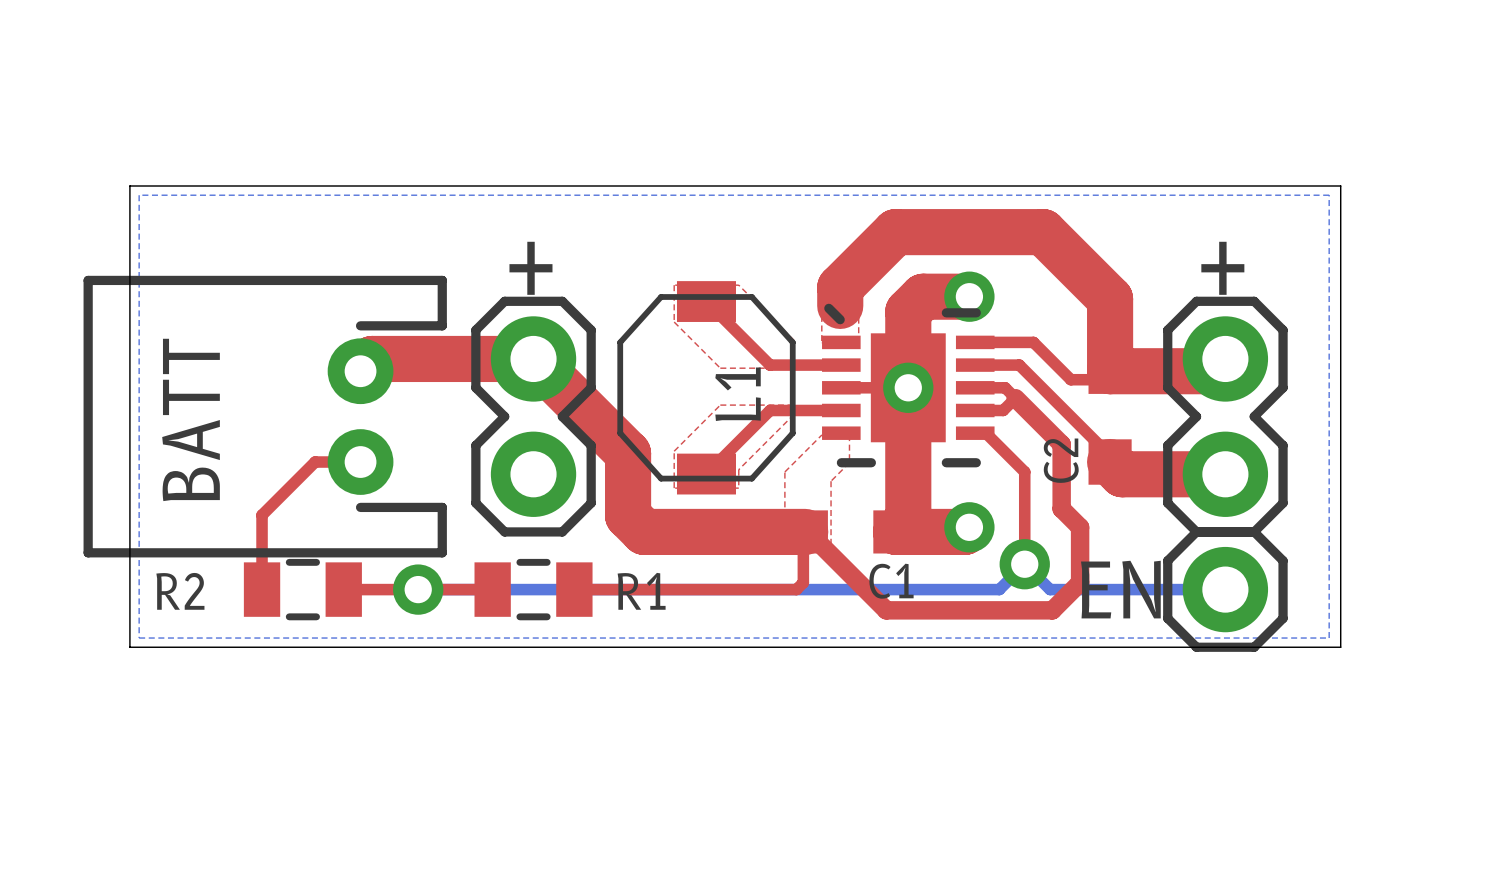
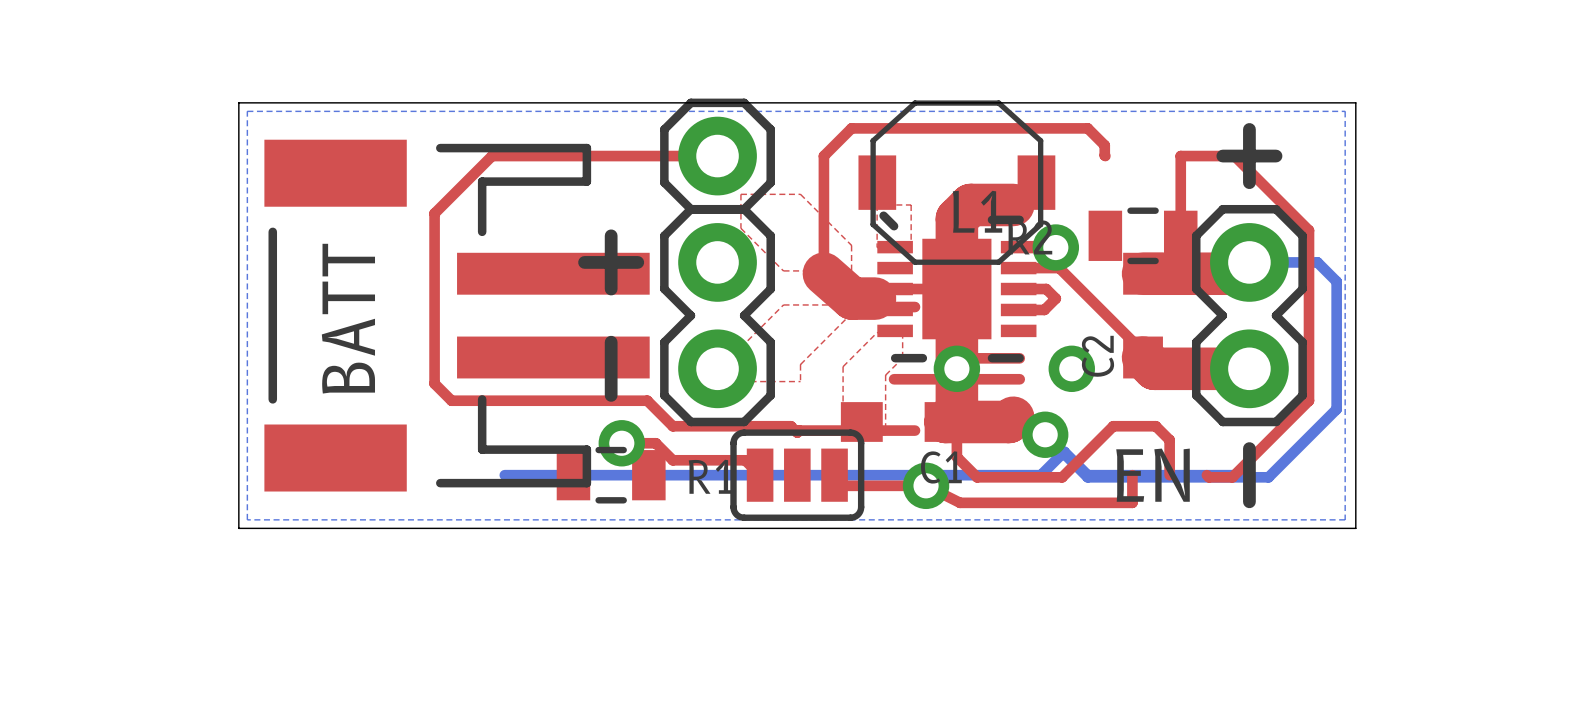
line: none -> (1249, 129) (1249, 182)
top track: none -> (717, 156) (492, 156) (434, 213) (434, 383) (451, 400) (647, 400) (672, 426) (790, 426) (797, 432) (799, 430) (915, 430)
top track: none -> (1105, 156) (1104, 145) (1087, 128) (851, 128) (823, 156) (823, 273) (852, 298) (874, 298) (883, 307) (915, 307)
line: none -> (1222, 156) (1276, 156)
text: + (530, 268) -> none
text: + (1222, 268) -> none
via: (969, 296) -> none
top track: (706, 301) (770, 365) (841, 365) -> none
top track: (840, 305) (840, 287) (895, 232) (1043, 232) (1110, 299) (1110, 371) (1101, 379) (1070, 379) (1033, 342) (975, 342) -> none
line: none -> (611, 235) (611, 289)
top track: none -> (1180, 235) (1180, 156) (1234, 156) (1309, 230) (1309, 400) (1232, 477) (1209, 477) (1206, 475)
via: none -> (1055, 247)
line: none -> (584, 262) (637, 262)
bottom track: none -> (1249, 262) (1317, 262) (1336, 281) (1336, 409) (1268, 477) (1087, 477) (1045, 434)
top track: (360, 370) (372, 358) (533, 358) (628, 453) (628, 515) (644, 531) (805, 531) -> none
L1 rotation: 0° (706, 387) -> 90° clockwise (956, 182)
L1 position: (706, 387) -> (956, 182)
via: (908, 387) -> none
top track: (1015, 398) (1061, 444) (1061, 508) (1080, 527) (1080, 582) (1052, 610) (886, 610) (807, 531) (805, 531) -> none
top track: (841, 410) (770, 410) (706, 474) -> none
part: (265, 416) -> none
part: none -> (457, 315)
BATT position: (533, 416) -> (717, 315)
BATT name position: BATT (191, 419) -> BATT (348, 318)
top track: (975, 433) (985, 433) (1024, 471) (1024, 564) -> none
line: none -> (611, 342) (611, 395)
top track: (360, 462) (315, 462) (262, 515) (262, 589) -> none
top track: none -> (1019, 358) (967, 358) (946, 379) (894, 379)
via: none -> (956, 368)
via: none -> (1071, 368)
top track: none -> (967, 379) (1019, 379)
via: (969, 527) -> none
top track: (805, 531) (803, 533) (803, 582) (796, 589) (574, 589) -> none
top track: none -> (956, 430) (956, 457) (977, 477) (1062, 477) (1113, 426) (1155, 426) (1169, 440) (1169, 475)
via: none -> (1045, 434)
top track: none -> (621, 443) (655, 443) (672, 460) (745, 460) (760, 475)
line: none -> (1249, 448) (1249, 501)
via: (1024, 564) -> none
R2 position: (302, 589) -> (1143, 235)
top track: (343, 589) (492, 589) -> none
via position: (418, 589) -> (621, 443)
part: none -> (797, 475)
top track: none -> (834, 475) (845, 485) (926, 485) (960, 502) (1132, 502) (1132, 475)
part position: (1225, 589) -> (717, 156)
via: none -> (926, 485)

